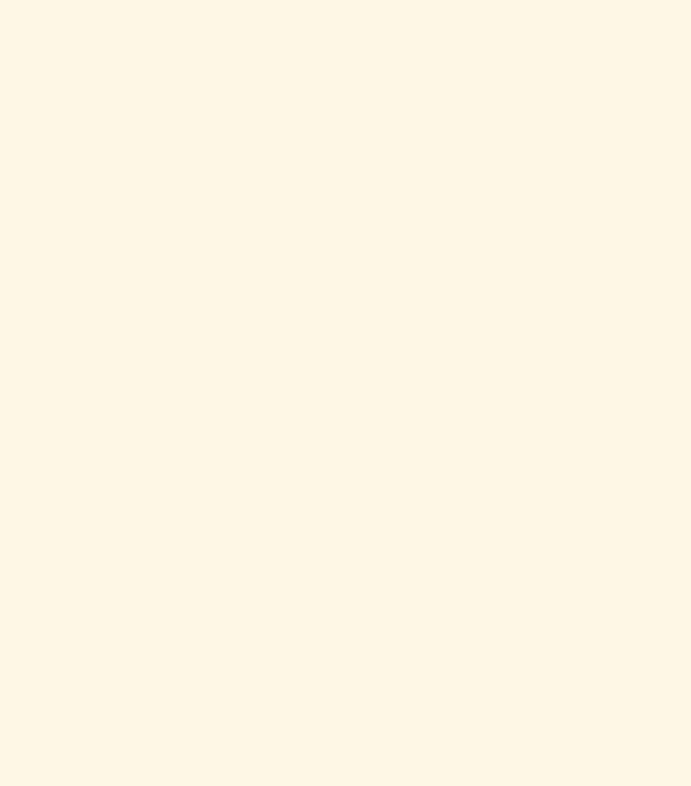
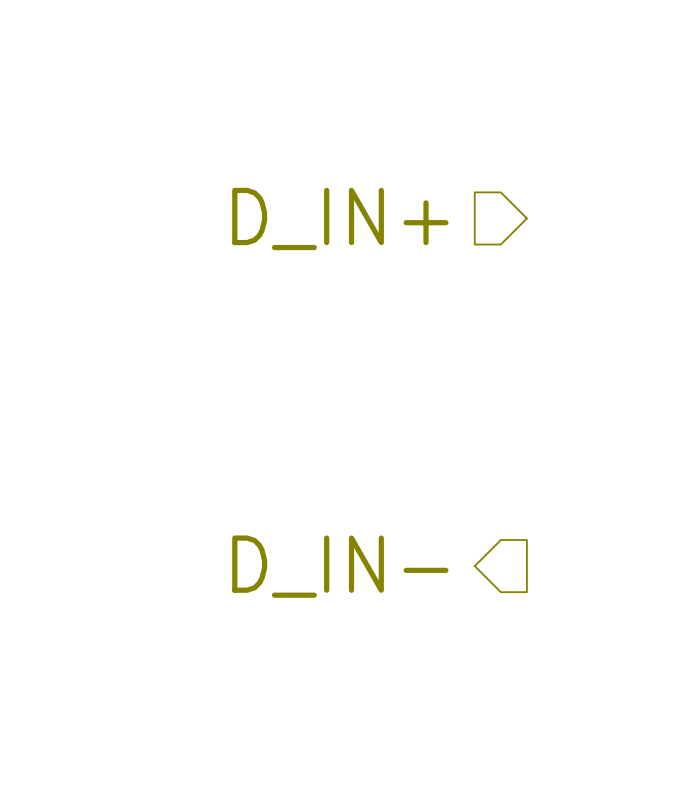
hierarchical label: none -> D_IN+ (340, 218)
hierarchical label: none -> D_IN- (340, 566)

